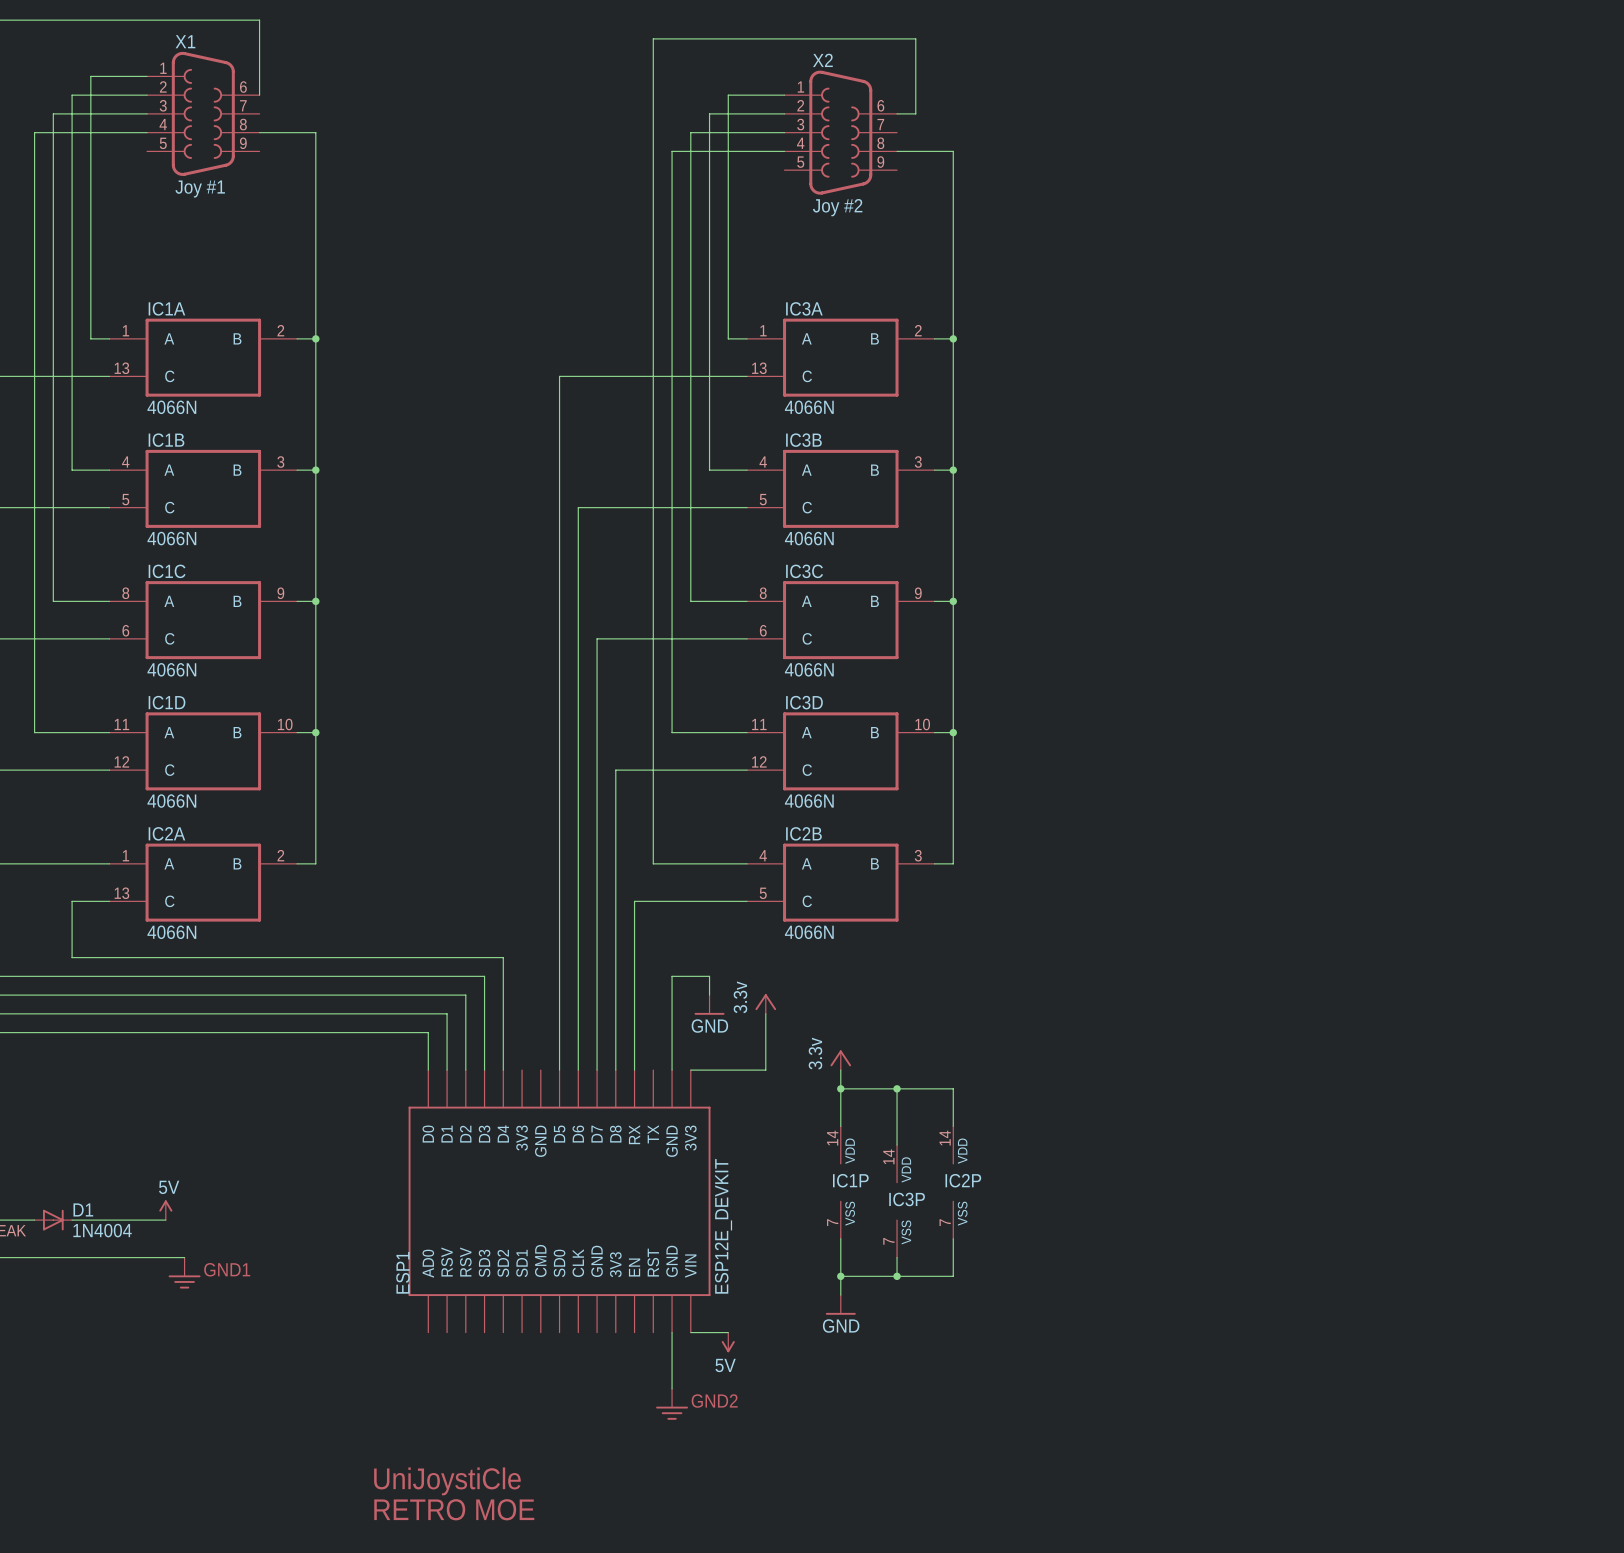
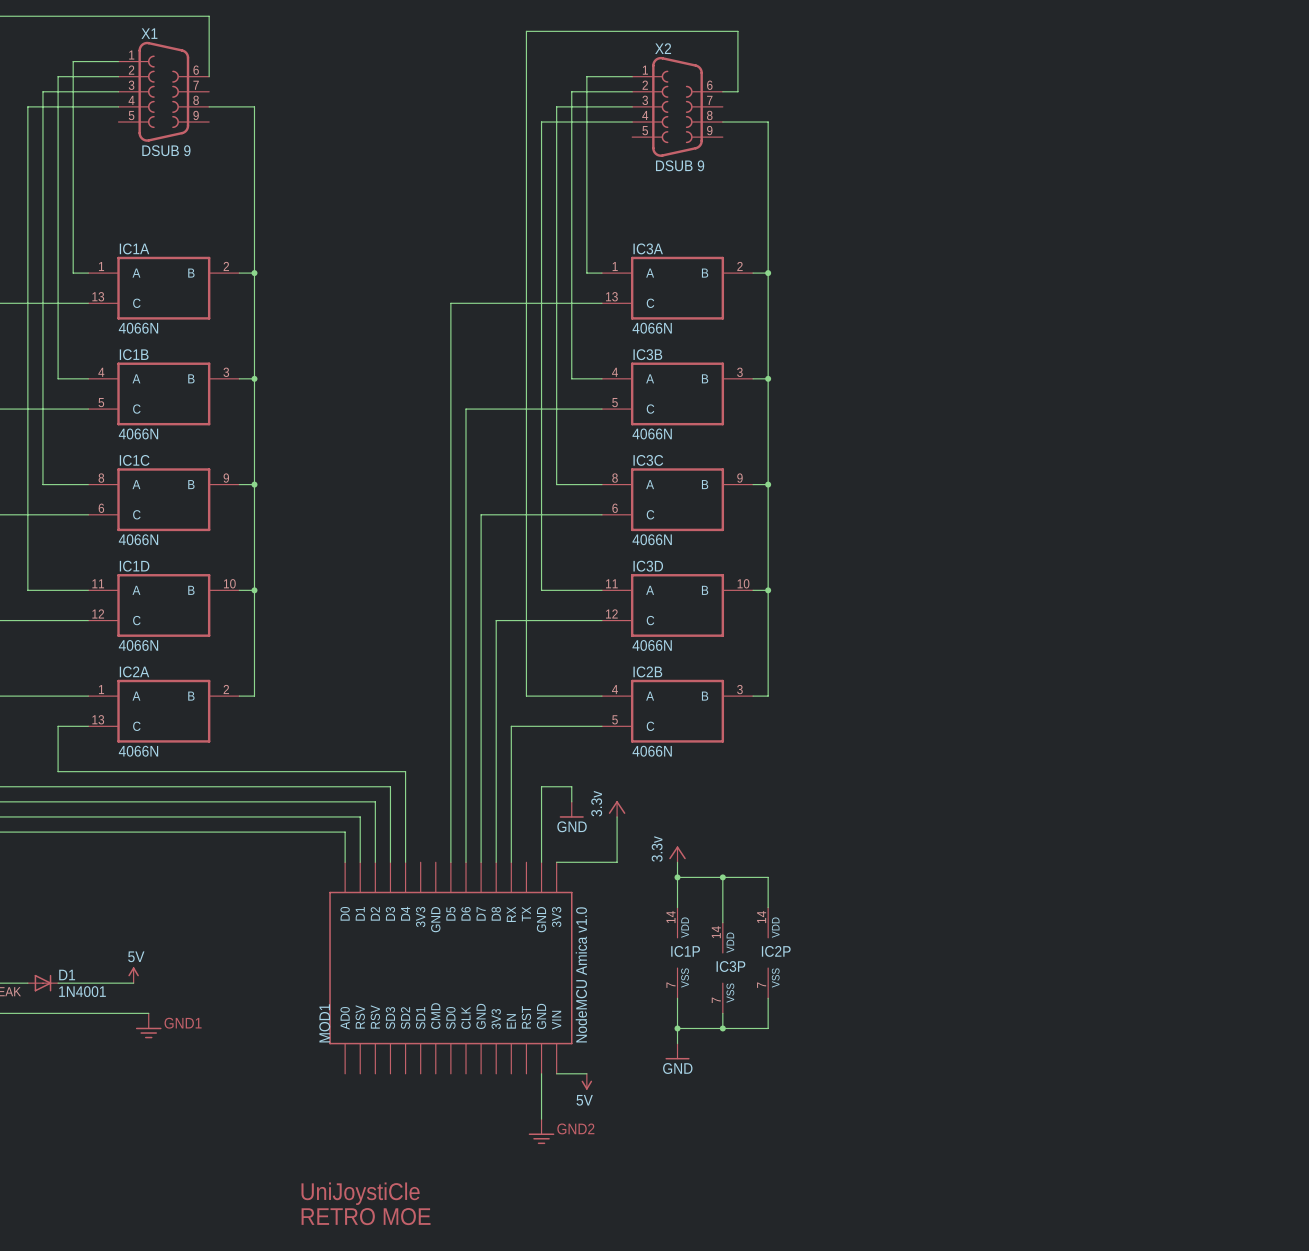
X1 value: Joy #1 (200, 189) -> DSUB 9 (166, 150)
X2 value: Joy #2 (837, 207) -> DSUB 9 (680, 165)
ESP1 value: ESP12E_DEVKIT (723, 1226) -> NodeMCU Amica v1.0 (581, 974)
D1 value: 1N4004 (102, 1230) -> 1N4001 (82, 991)
ESP1 name: ESP1 (402, 1272) -> MOD1 (324, 1023)

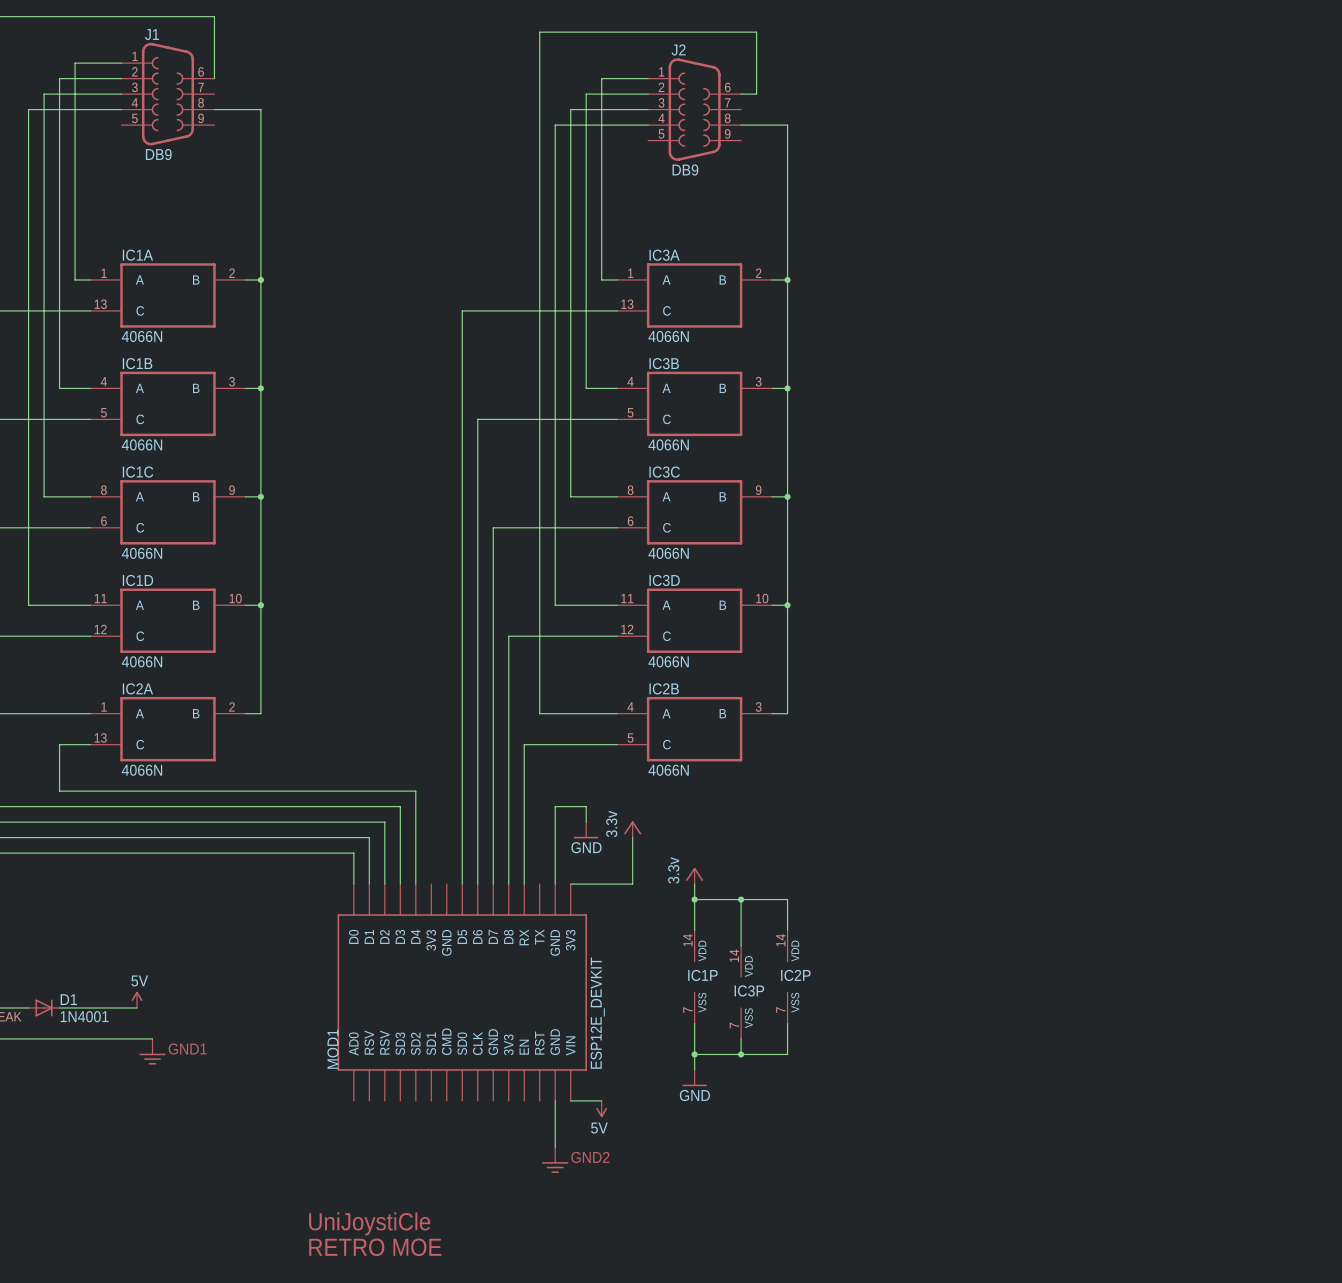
X1: DSUB 9 (163, 91) -> none
J1: none -> DB9 (167, 94)
X2: DSUB 9 (677, 106) -> none
J2: none -> DB9 (694, 109)
MOD1 value: NodeMCU Amica v1.0 (581, 974) -> ESP12E_DEVKIT (597, 1013)

